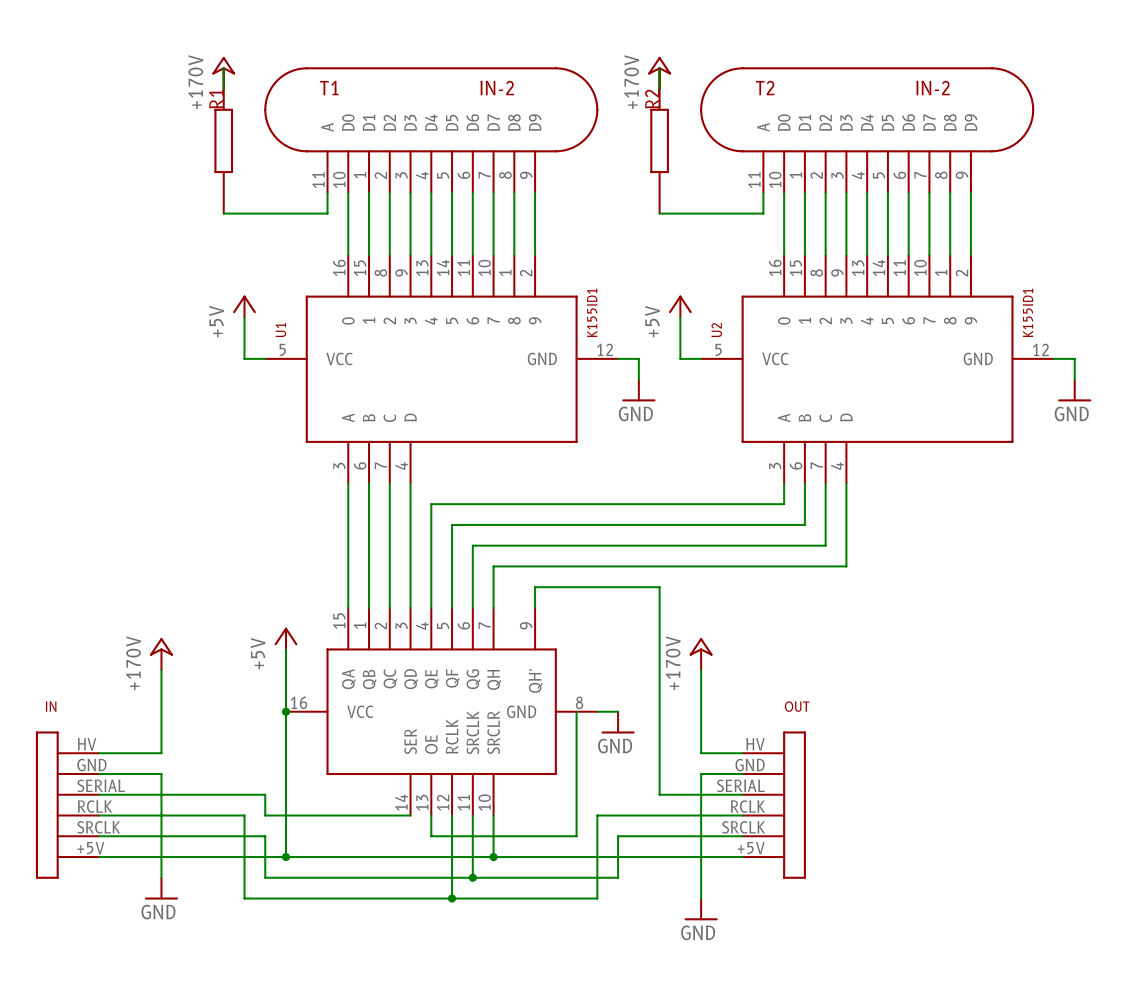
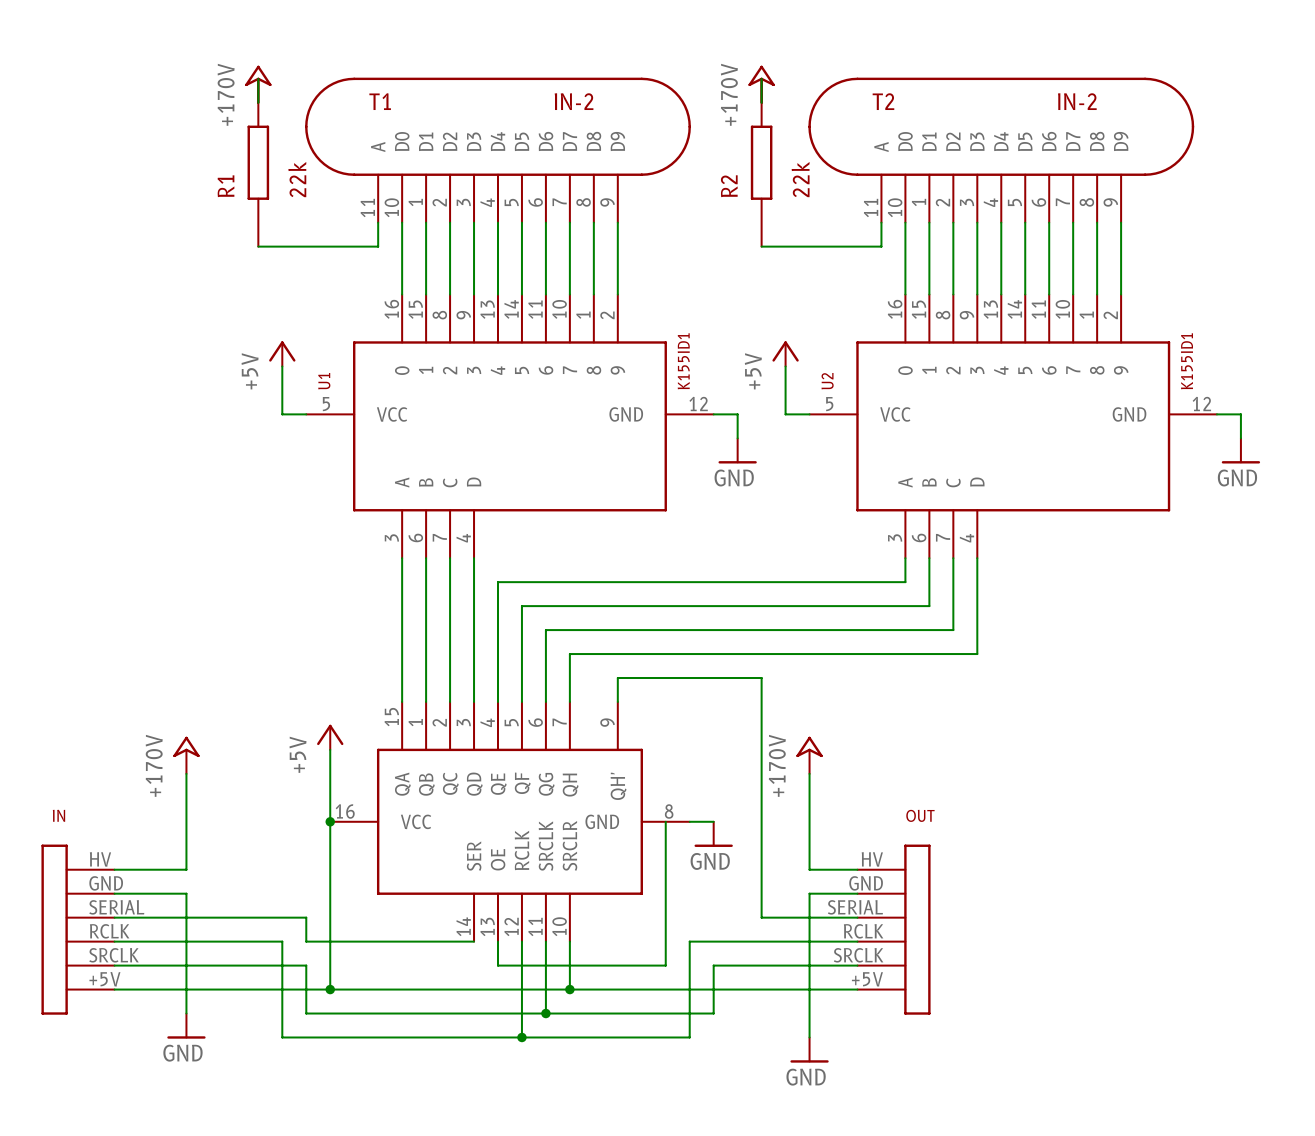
R1 name position: R1 (216, 99) -> R1 (225, 186)
R2 name position: R2 (652, 99) -> R2 (729, 186)
R1 value: none -> 22k (297, 179)
R2 value: none -> 22k (800, 179)

